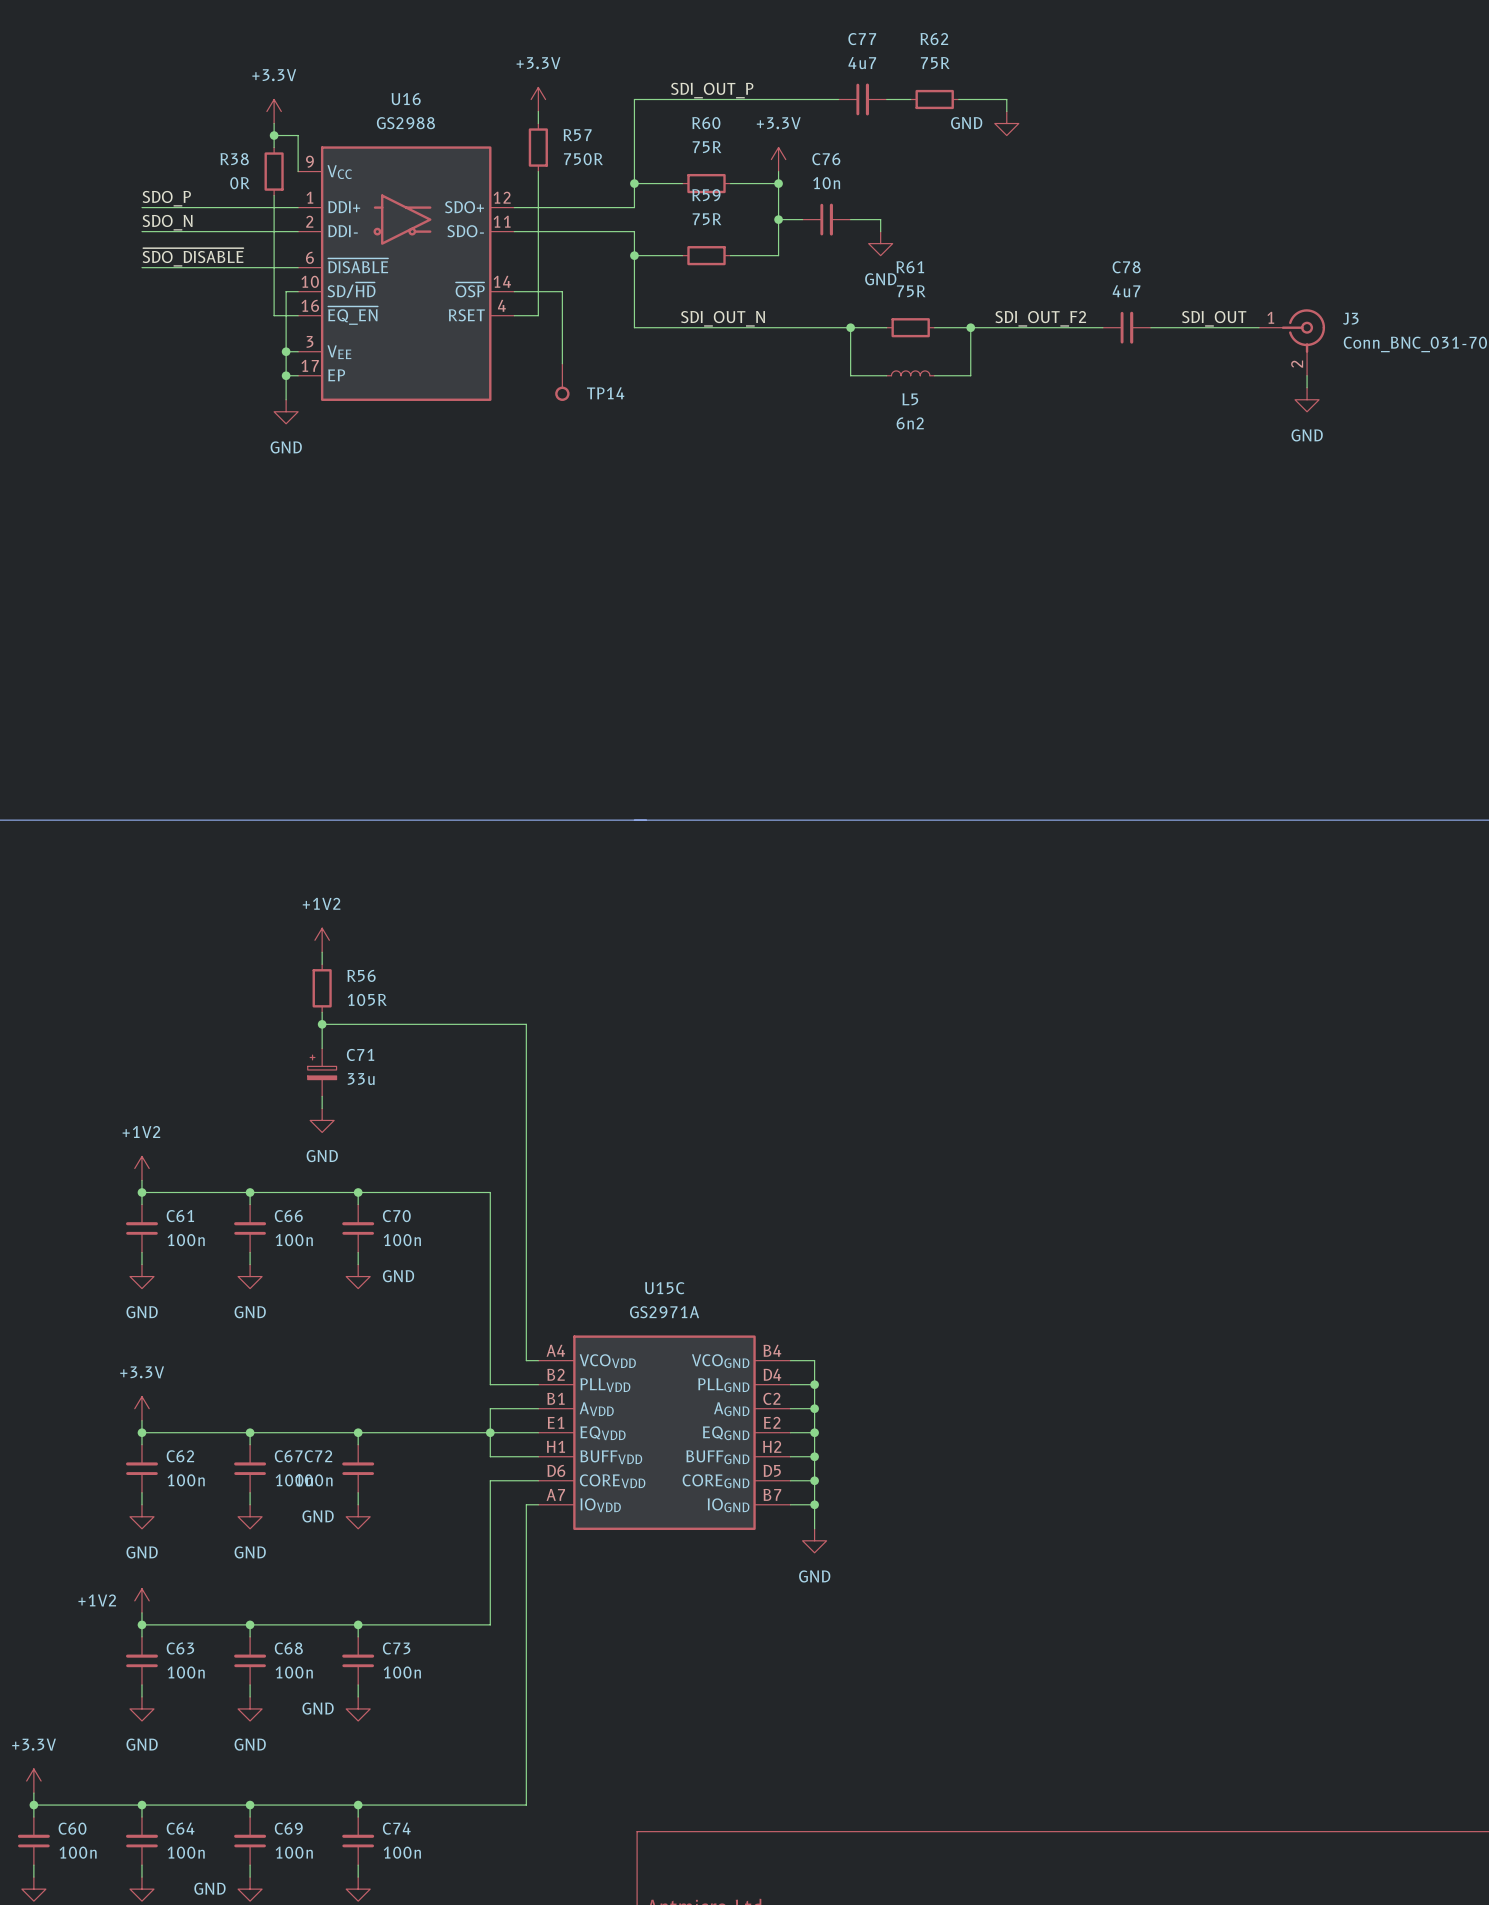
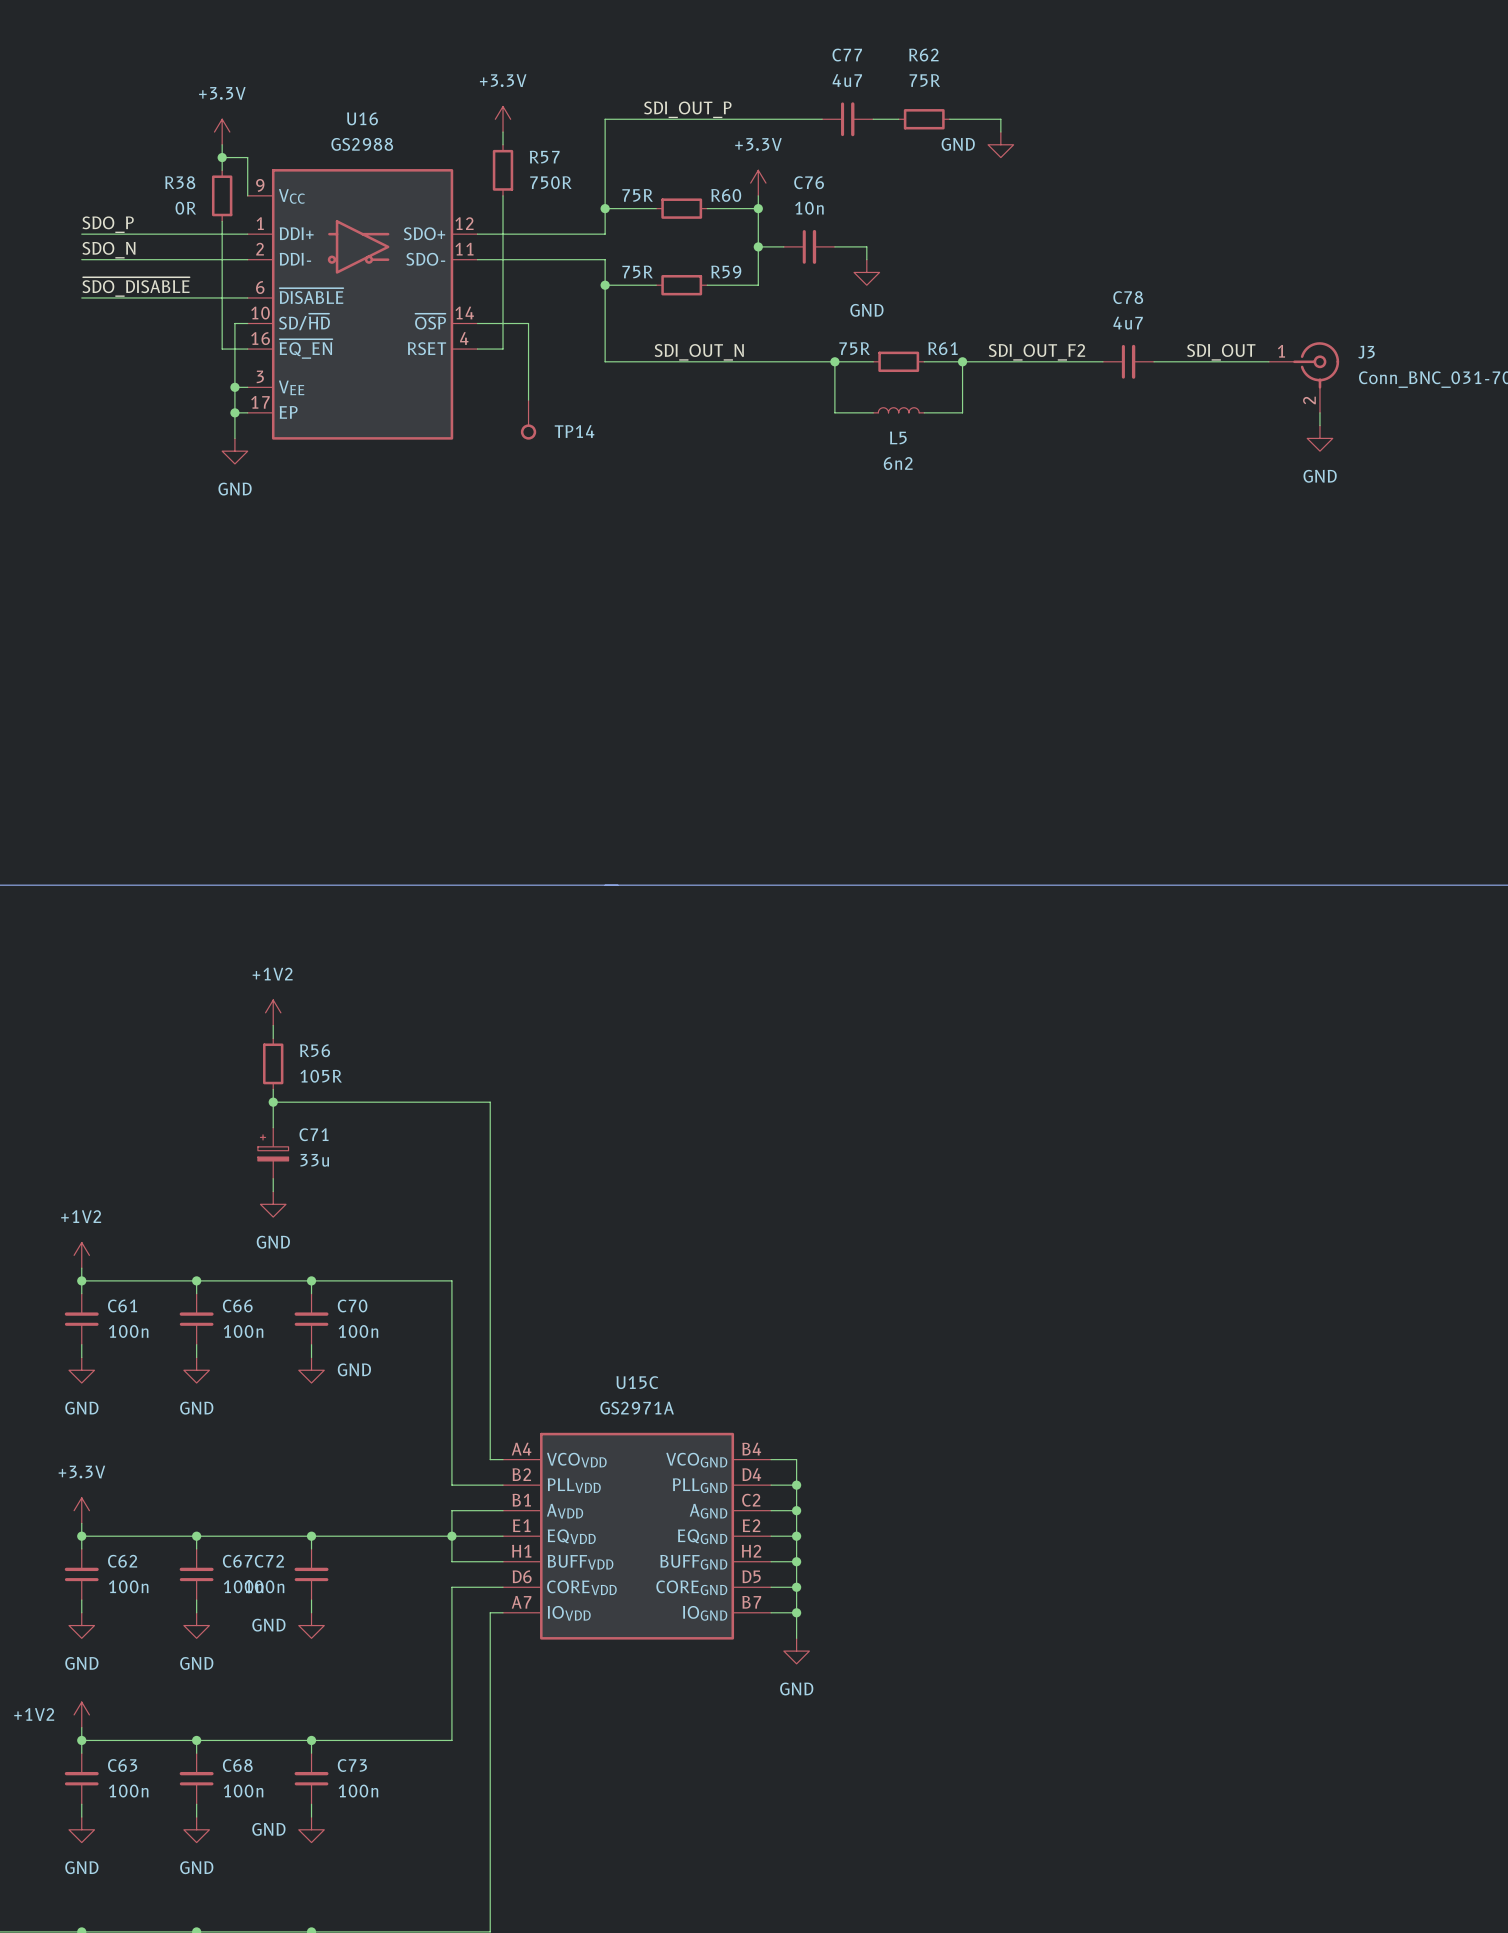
R60 name position: R60 (706, 123) -> R60 (726, 195)
R60 text position: 75R (707, 147) -> 75R (637, 195)
R59 name position: R59 (706, 195) -> R59 (726, 272)
R59 text position: 75R (707, 219) -> 75R (637, 272)
R61 name position: R61 (910, 267) -> R61 (943, 348)
R61 text position: 75R (911, 291) -> 75R (854, 348)

